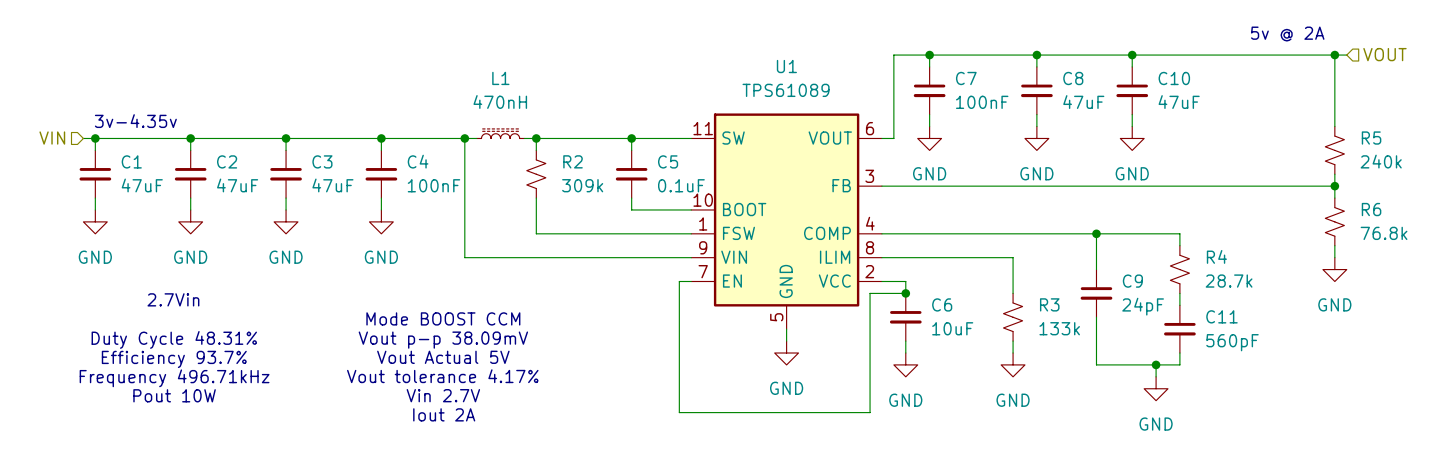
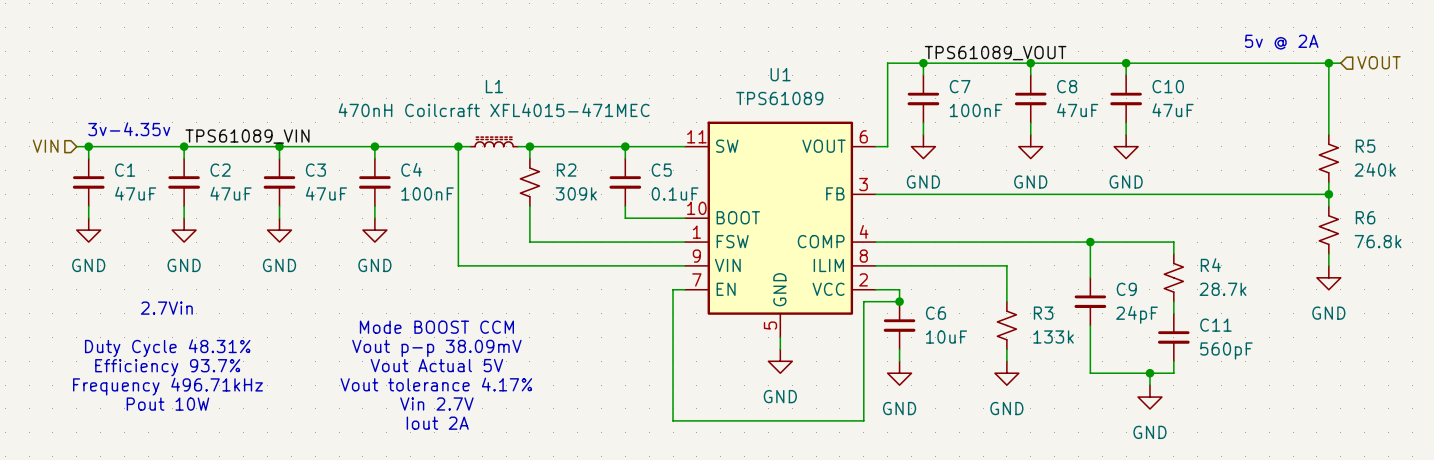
label: none -> TPS61089_VOUT (995, 53)
L1 value: 470nH (500, 101) -> 470nH Coilcraft XFL4015-471MEC (494, 110)
label: none -> TPS61089_VIN (247, 136)

